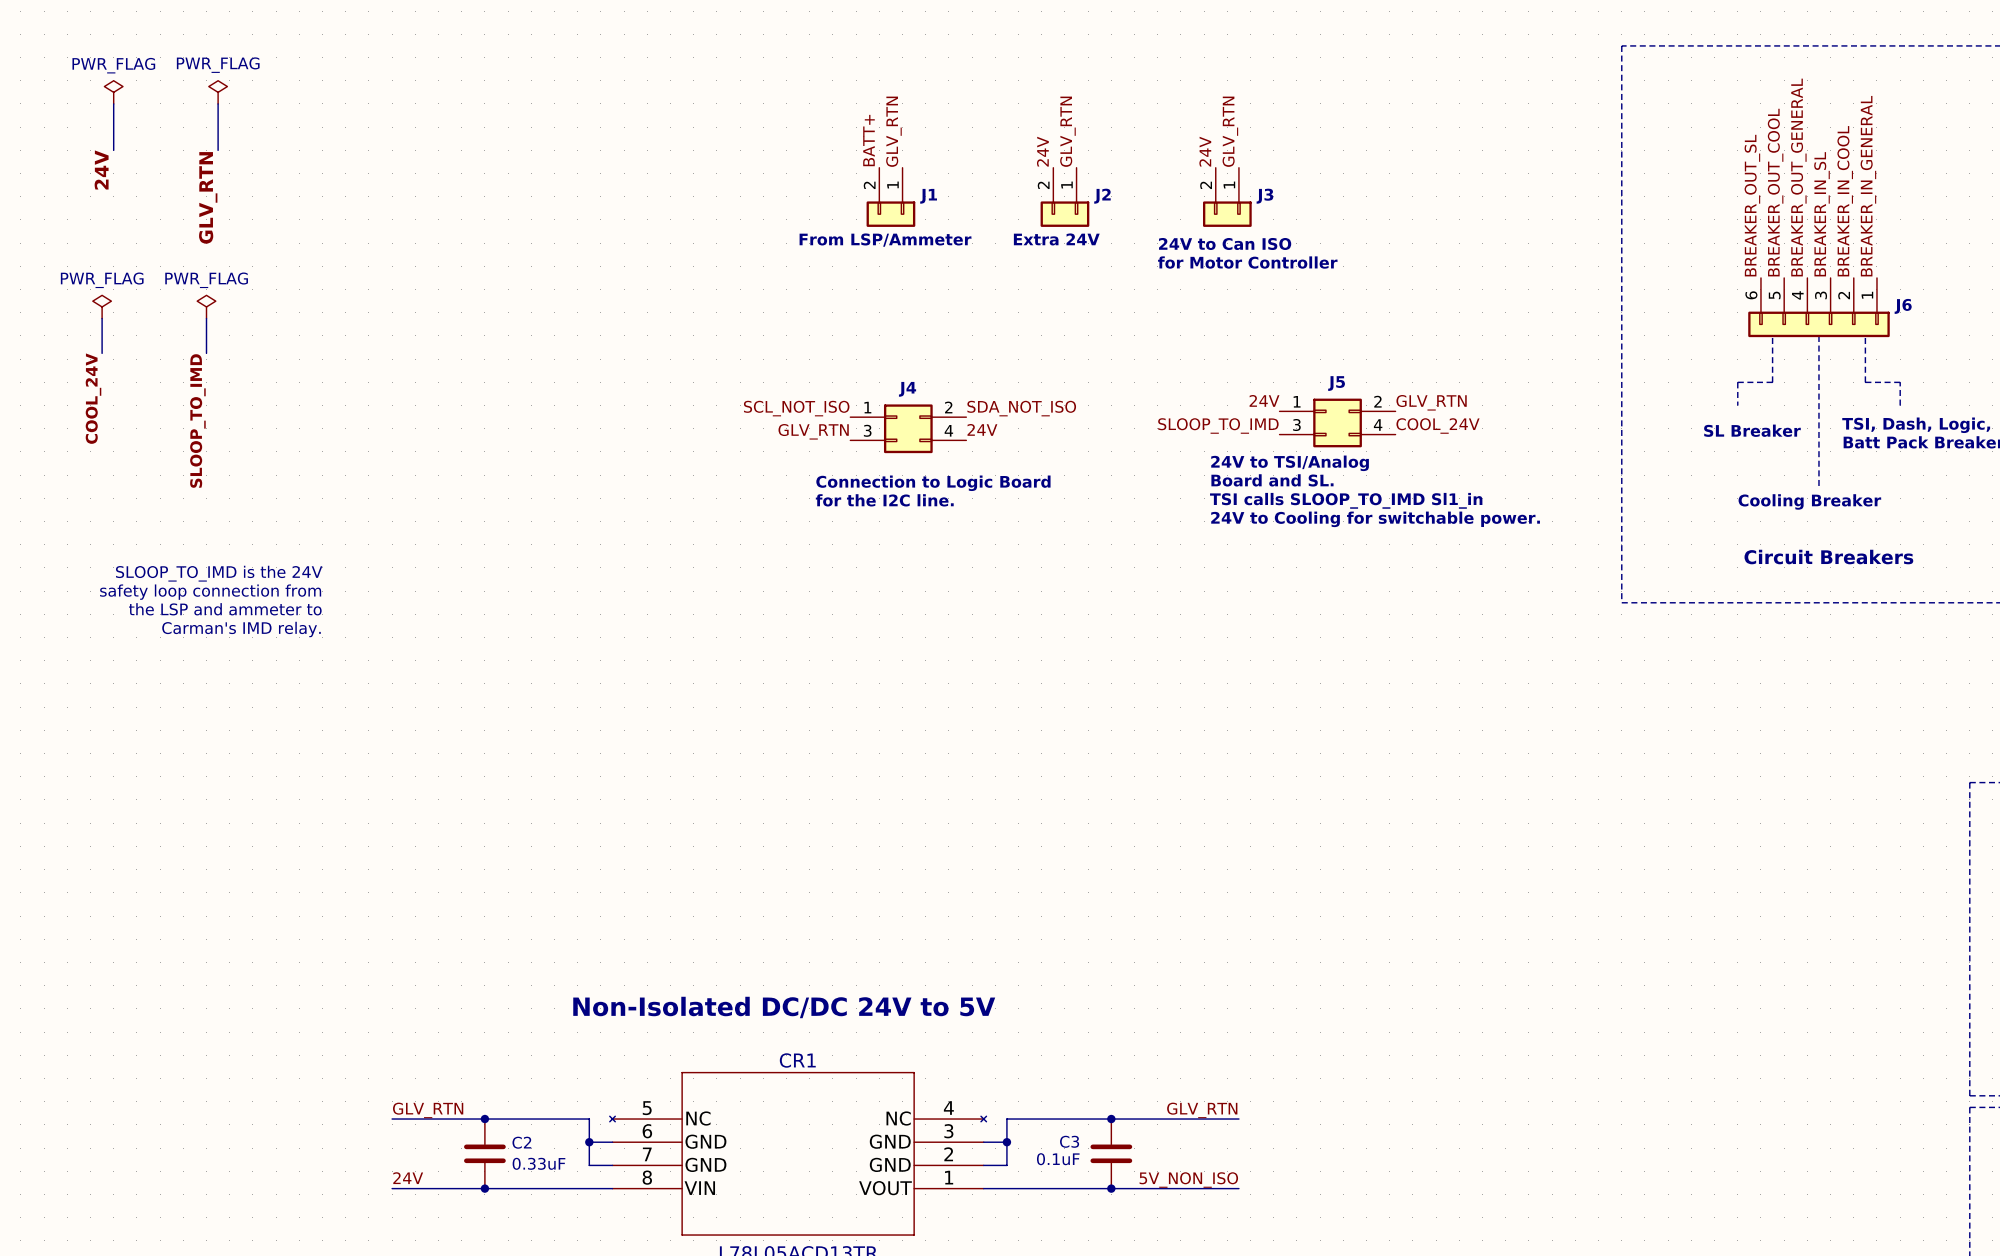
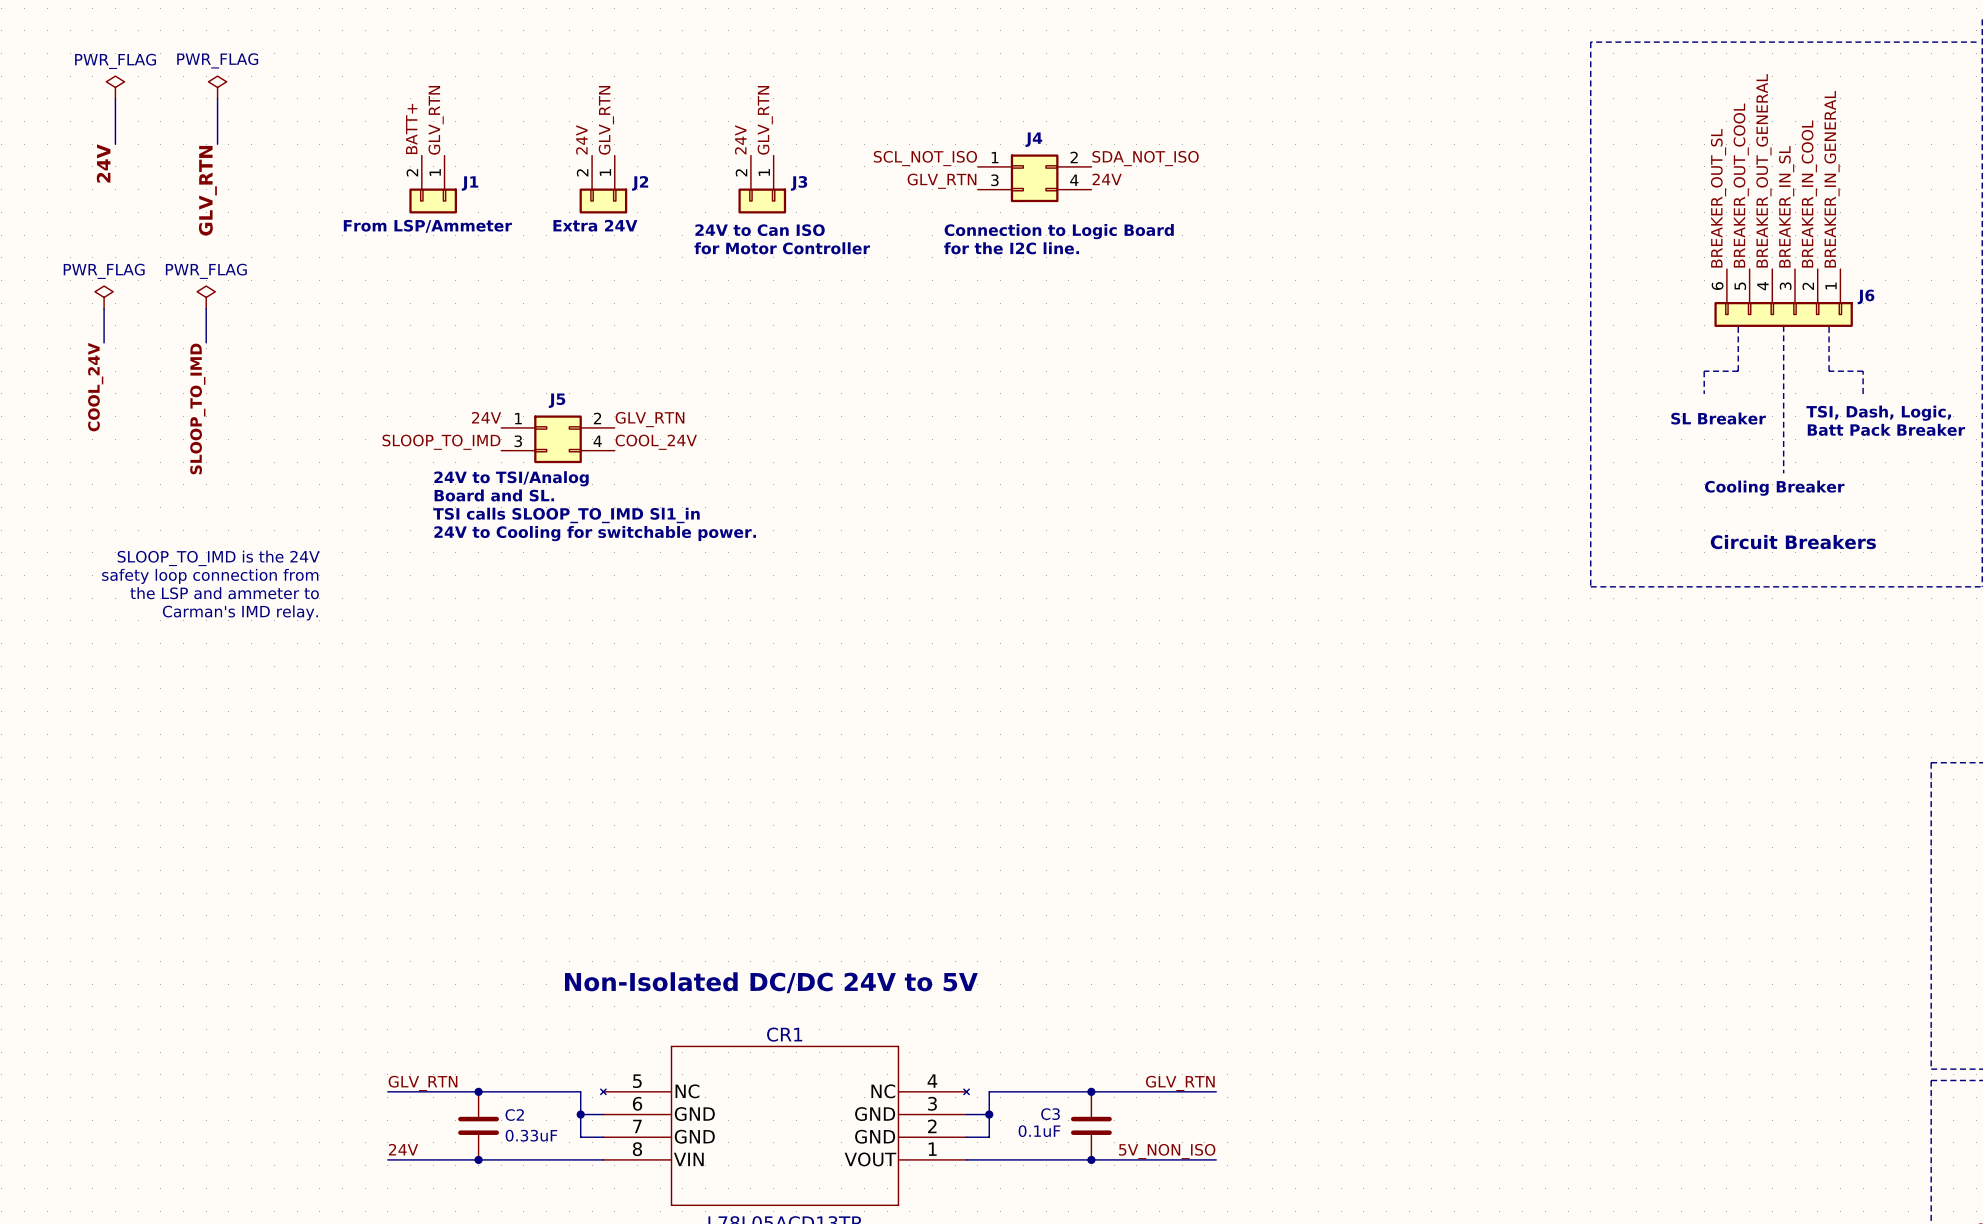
label: none -> GLV_RTN (436, 120)
label: none -> GLV_RTN (606, 120)
label: none -> GLV_RTN (765, 120)
label: GLV_RTN (893, 131) -> none
label: GLV_RTN (1067, 131) -> none
label: GLV_RTN (1230, 131) -> none
label: none -> BATT+ (411, 128)
label: BATT+ (868, 140) -> none
label: none -> 24V (581, 139)
label: none -> 24V (740, 139)
label: 24V (1042, 151) -> none
label: 24V (1205, 151) -> none
label: none -> SCL_NOT_ISO (925, 158)
label: none -> SDA_NOT_ISO (1145, 158)
label: none -> 24V (1107, 179)
label: none -> GLV_RTN (942, 181)
J1 position: (890, 197) -> (433, 184)
J2 position: (1064, 197) -> (603, 184)
J3 position: (1227, 197) -> (762, 184)
text: none -> Extra 24V (595, 225)
text: none -> From LSP/Ammeter (427, 226)
text: none -> 24V to Can ISO (760, 230)
text: Extra 24V (1056, 239) -> none
text: none -> Connection to Logic Board (1059, 231)
text: From LSP/Ammeter (885, 240) -> none
text: 24V to Can ISO (1225, 243) -> none
text: none -> for Motor Controller (782, 248)
text: none -> for the I2C line. (1011, 248)
text: for Motor Controller (1247, 262) -> none
label: 24V (1264, 400) -> none
label: GLV_RTN (1431, 402) -> none
label: SCL_NOT_ISO (796, 408) -> none
label: SDA_NOT_ISO (1021, 408) -> none
J5 position: (1337, 422) -> (558, 439)
label: SLOOP_TO_IMD (1218, 425) -> none
label: COOL_24V (1437, 425) -> none
J4 position: (908, 428) -> (1034, 178)
label: none -> 24V (486, 417)
label: 24V (982, 429) -> none
label: none -> GLV_RTN (649, 419)
label: GLV_RTN (813, 431) -> none
label: none -> SLOOP_TO_IMD (441, 442)
label: none -> COOL_24V (656, 442)
text: 24V to TSI/Analog (1290, 463) -> none
text: Board and SL. (1272, 480) -> none
text: Connection to Logic Board (933, 483) -> none
text: none -> 24V to TSI/Analog (511, 478)
text: for the I2C line. (884, 500) -> none
text: TSI calls SLOOP_TO_IMD Sl1_in (1346, 500) -> none
text: none -> Board and SL. (494, 495)
text: 24V to Cooling for switchable power. (1375, 519) -> none
text: none -> TSI calls SLOOP_TO_IMD Sl1_in (566, 515)
text: none -> 24V to Cooling for switchable power. (595, 533)

